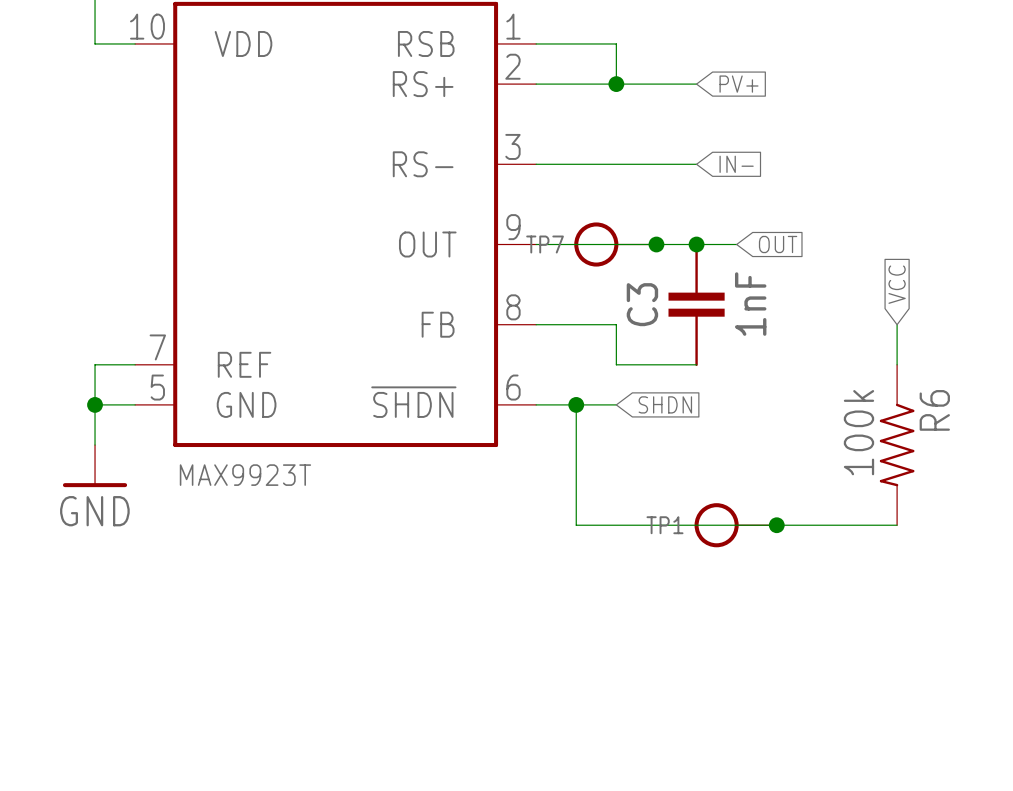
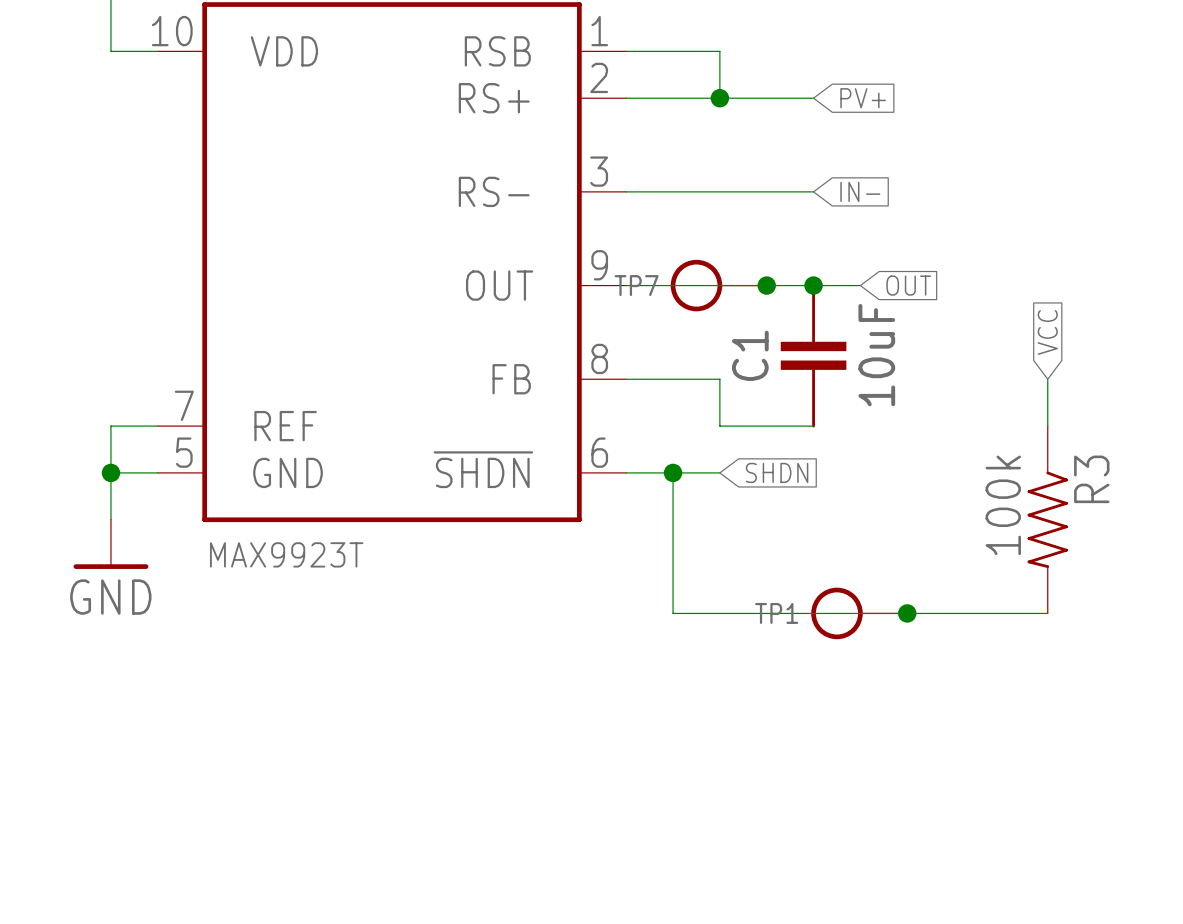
C3 name: C3 (642, 304) -> C1 (750, 355)
C3 value: 1nF (750, 304) -> 10uF (876, 355)
R6 name: R6 (934, 410) -> R3 (1091, 479)

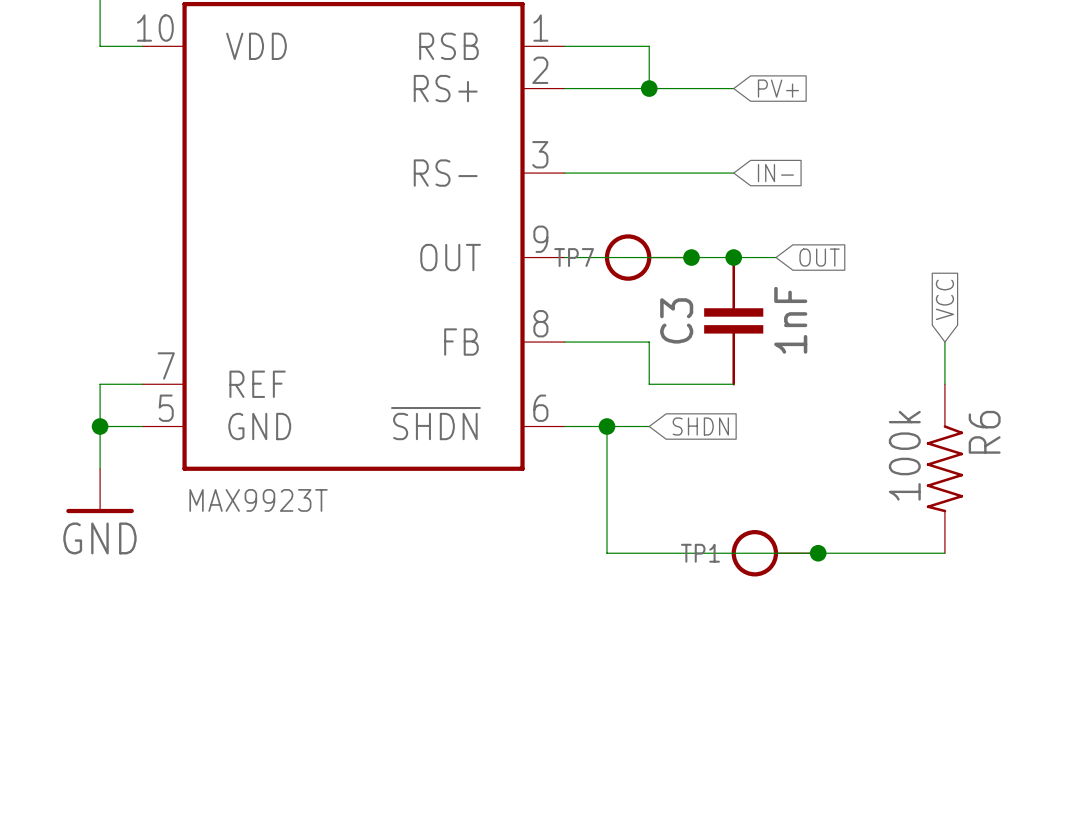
C1 name: C1 (750, 355) -> C3 (676, 320)
C1 value: 10uF (876, 355) -> 1nF (790, 320)
R3 name: R3 (1091, 479) -> R6 (984, 432)

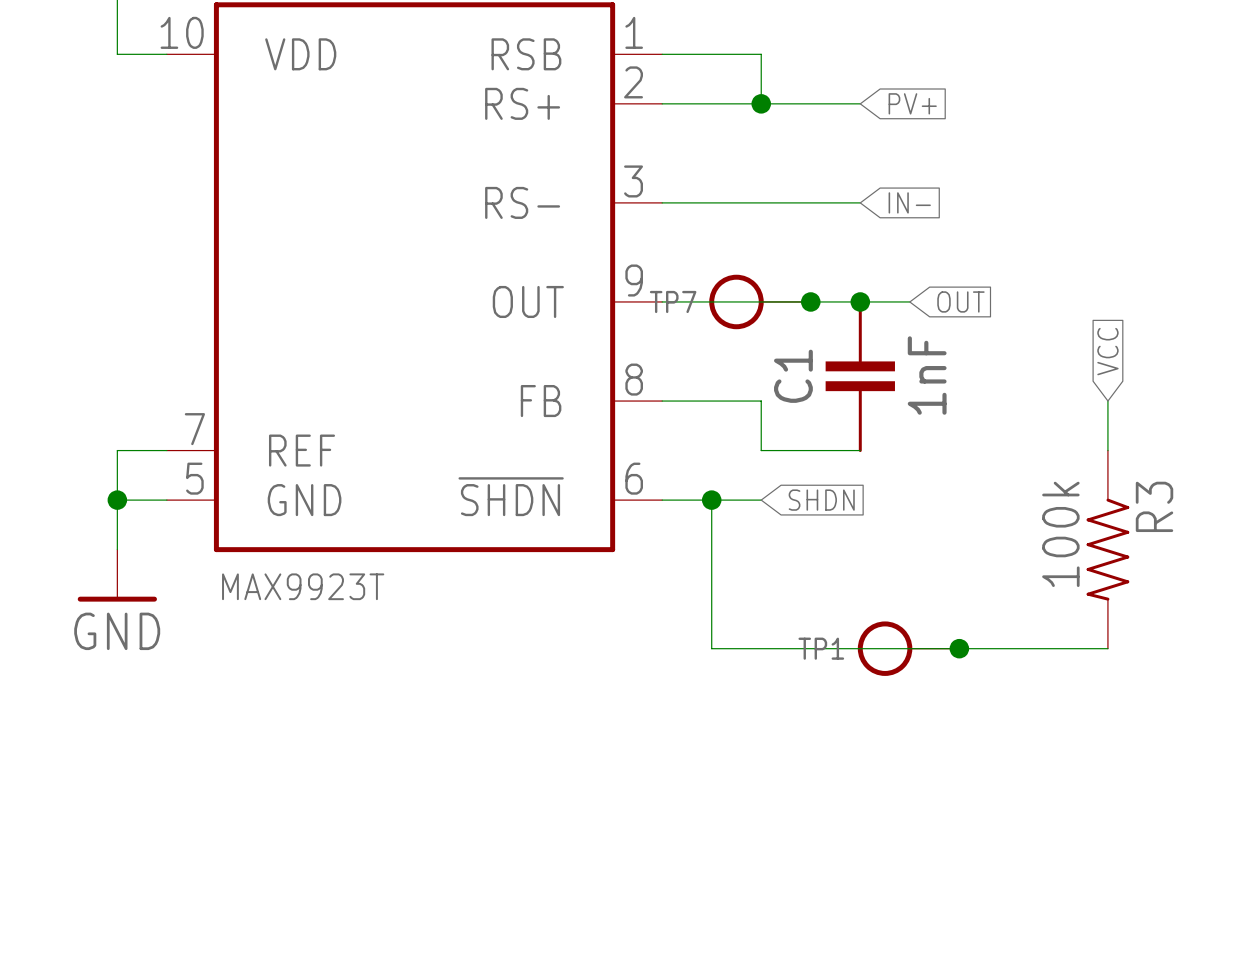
C3 name: C3 (676, 320) -> C1 (793, 376)
R6 name: R6 (984, 432) -> R3 (1154, 506)

